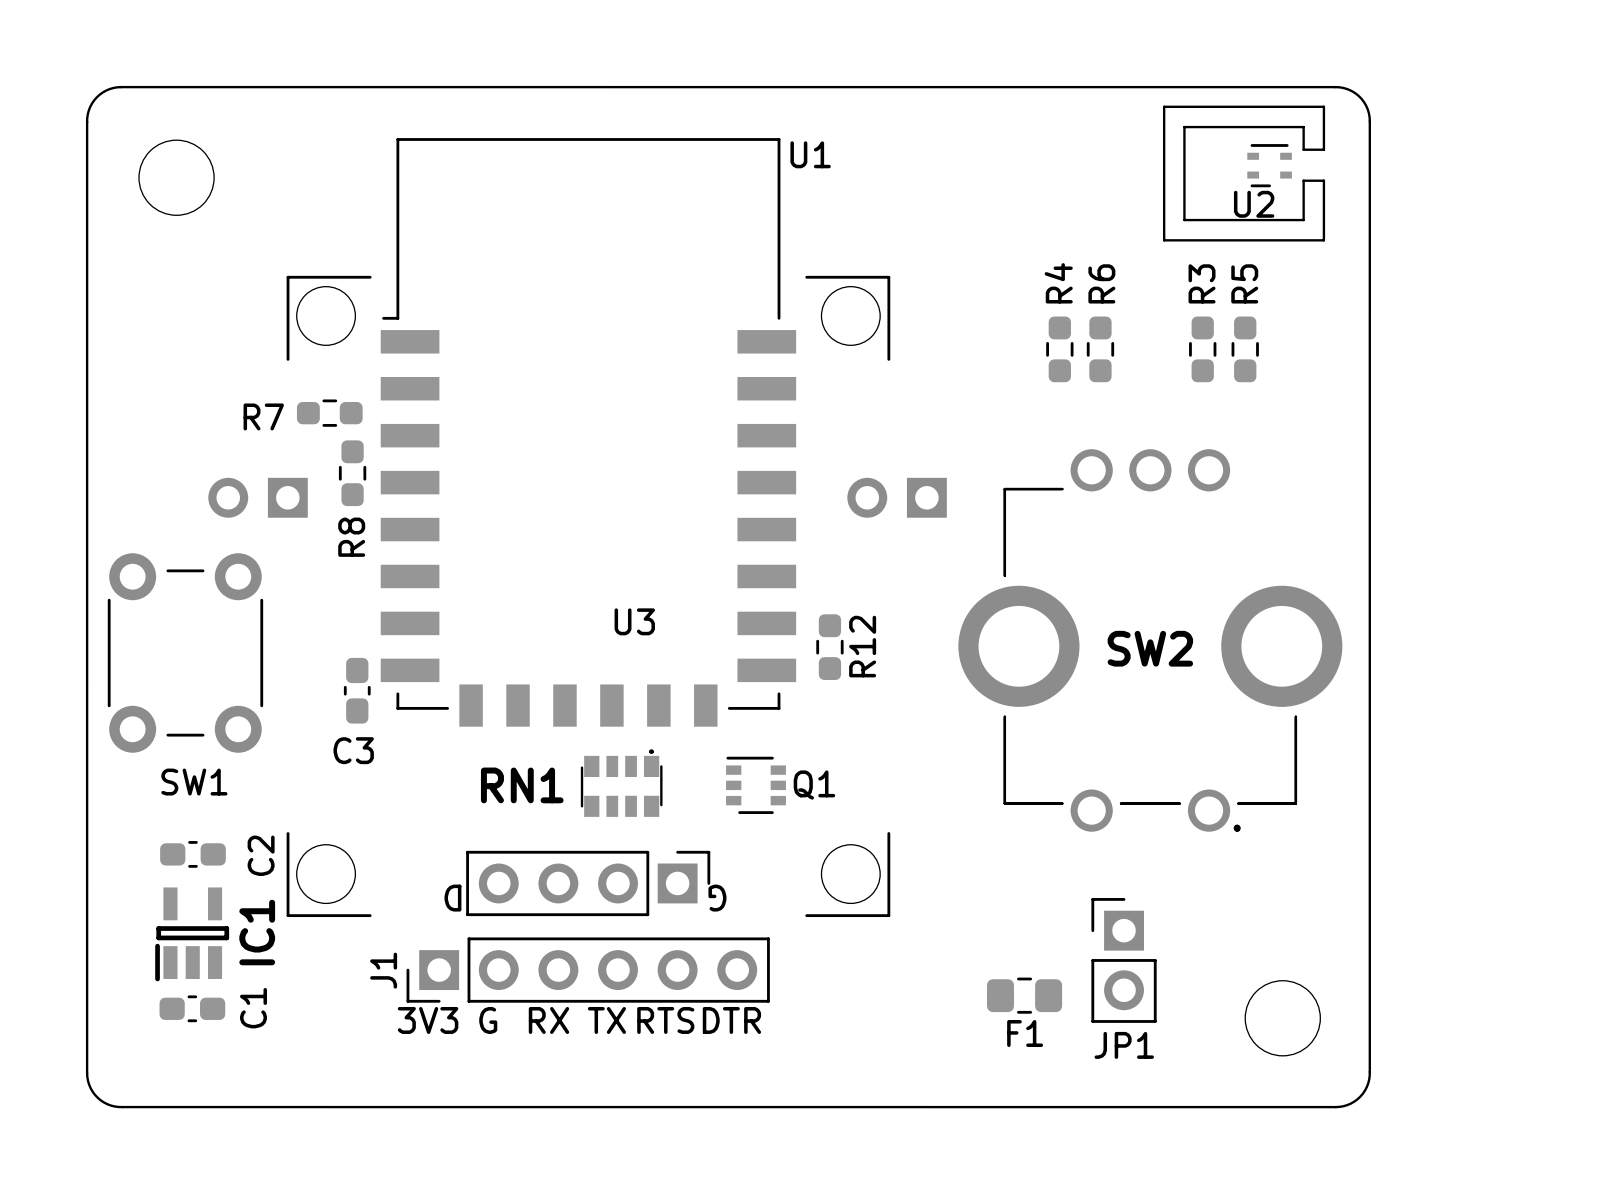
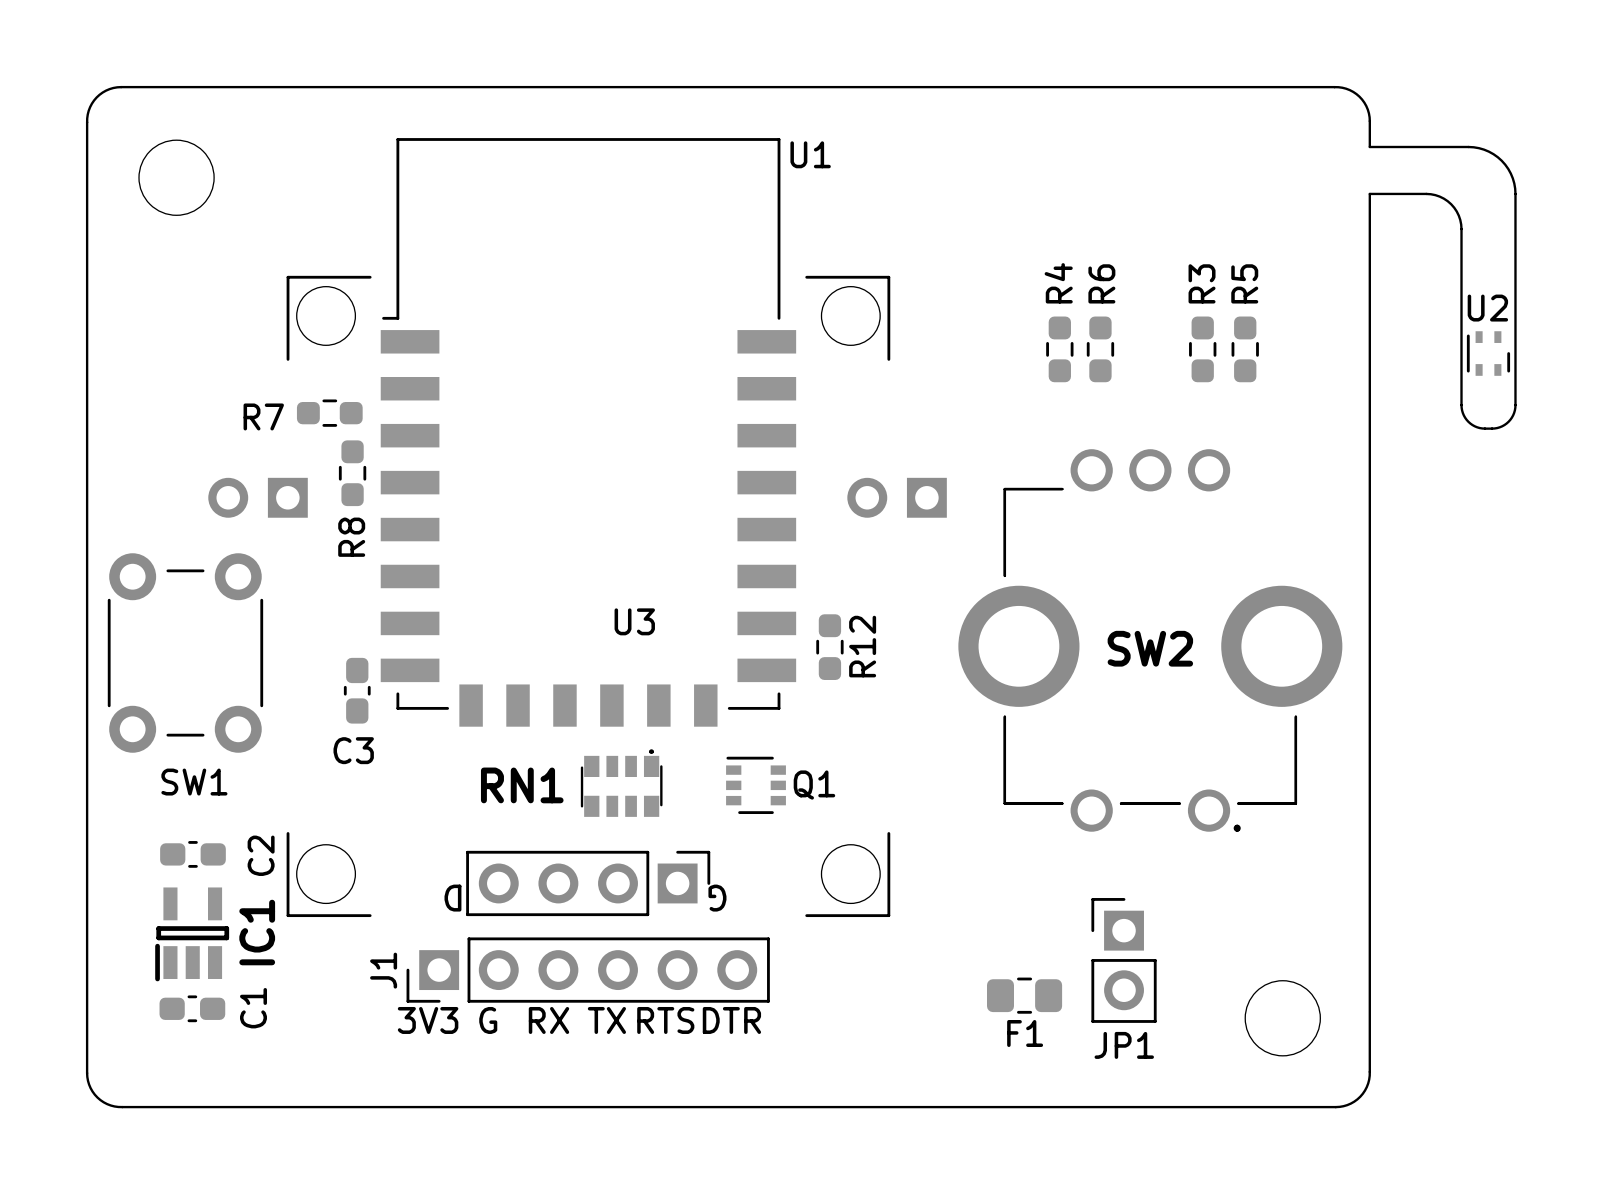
board edge: (1164, 106) (1164, 240) (1323, 240) (1323, 180) (1303, 180) (1303, 220) (1184, 220) (1184, 127) (1303, 127) (1303, 149) (1323, 149) (1323, 106) (1164, 106) -> none
board edge: (1369, 147) (1369, 193) -> (1369, 147) (1478, 148) (1497, 157) (1510, 173) (1515, 193) (1515, 405) (1511, 417) (1504, 425) (1494, 428) (1477, 427) (1468, 421) (1462, 410) (1461, 229) (1456, 211) (1447, 201) (1435, 195) (1369, 193)
U2 rotation: 0° (1269, 165) -> 90° counterclockwise (1488, 353)
U2 position: (1269, 165) -> (1488, 353)
U2 name position: U2 (1254, 204) -> U2 (1487, 308)

